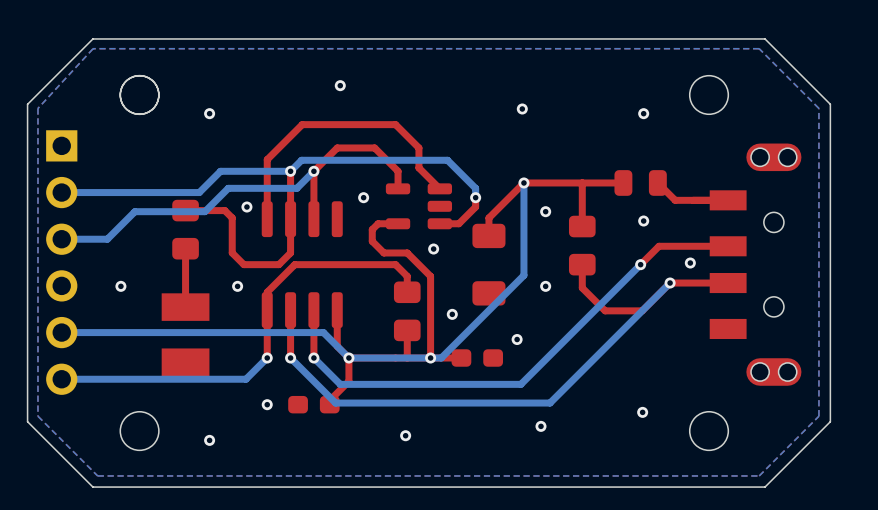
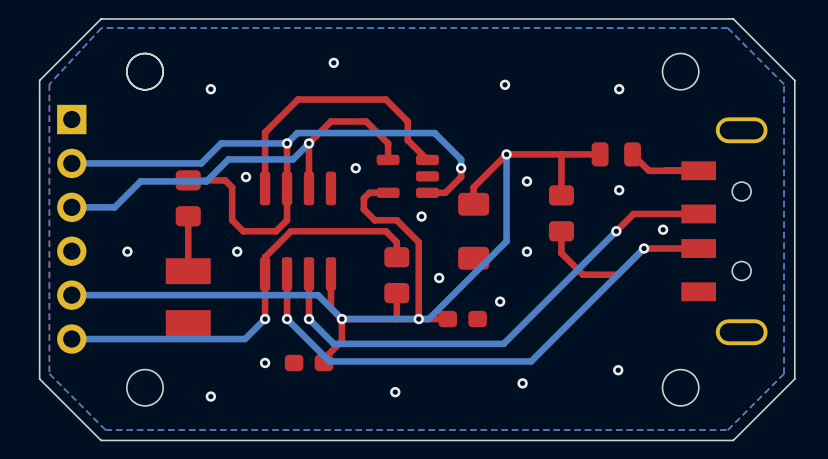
part footprint: [709, 143, 802, 386] -> [681, 117, 768, 346]

